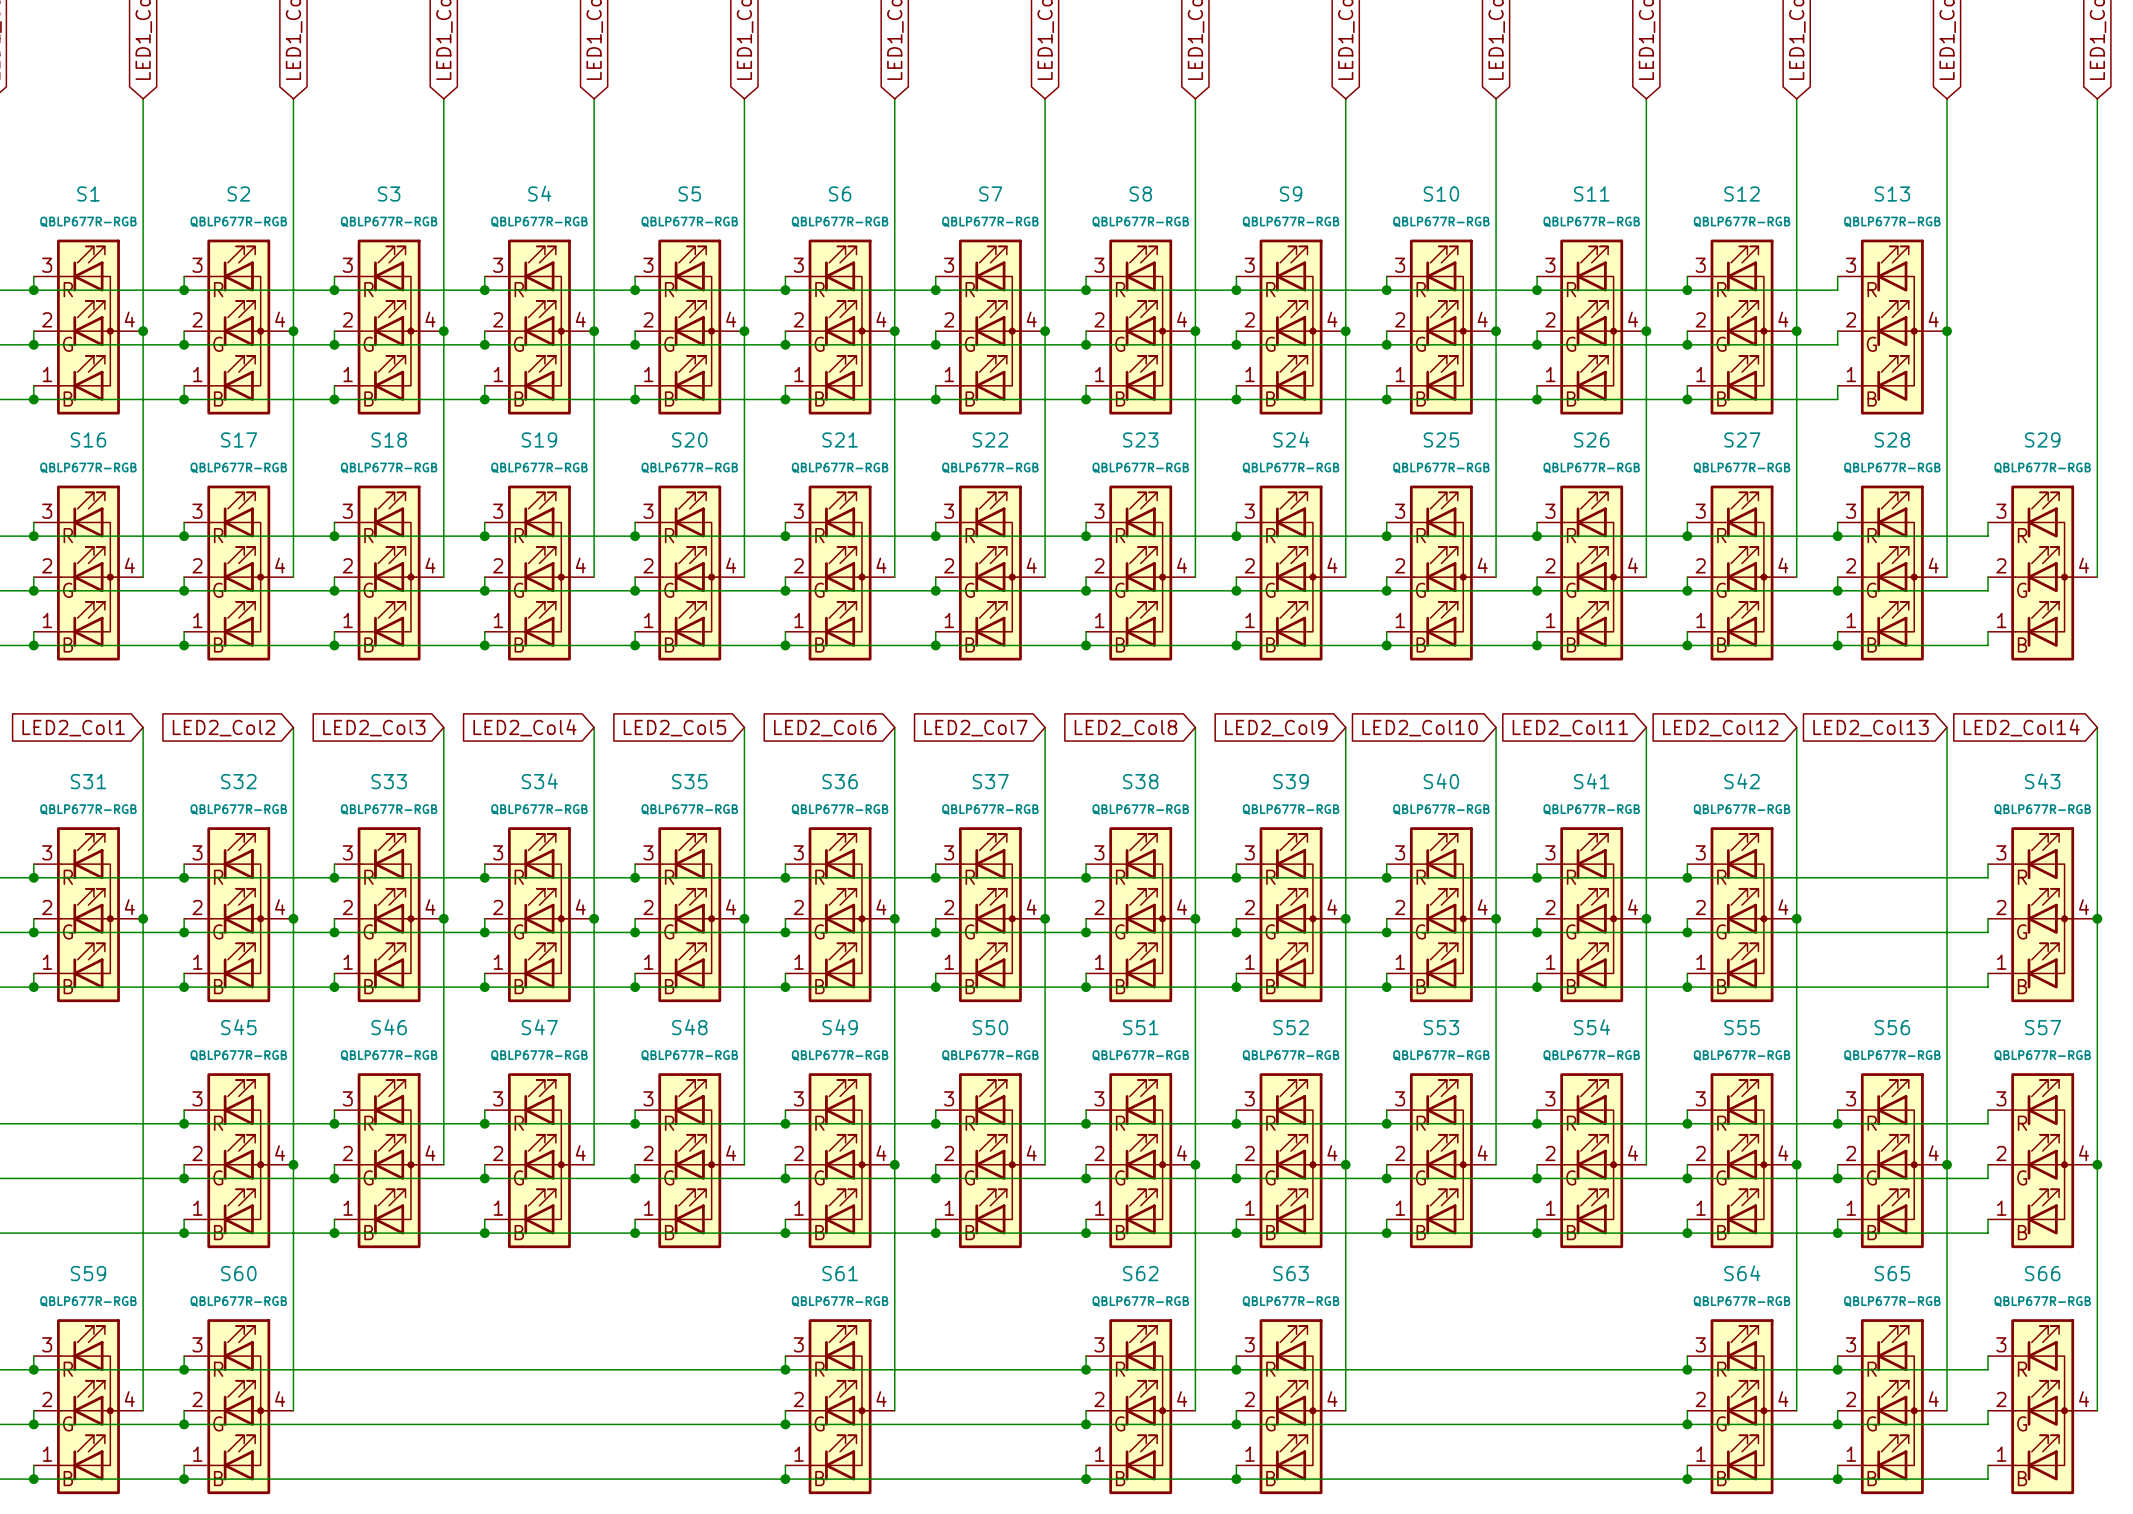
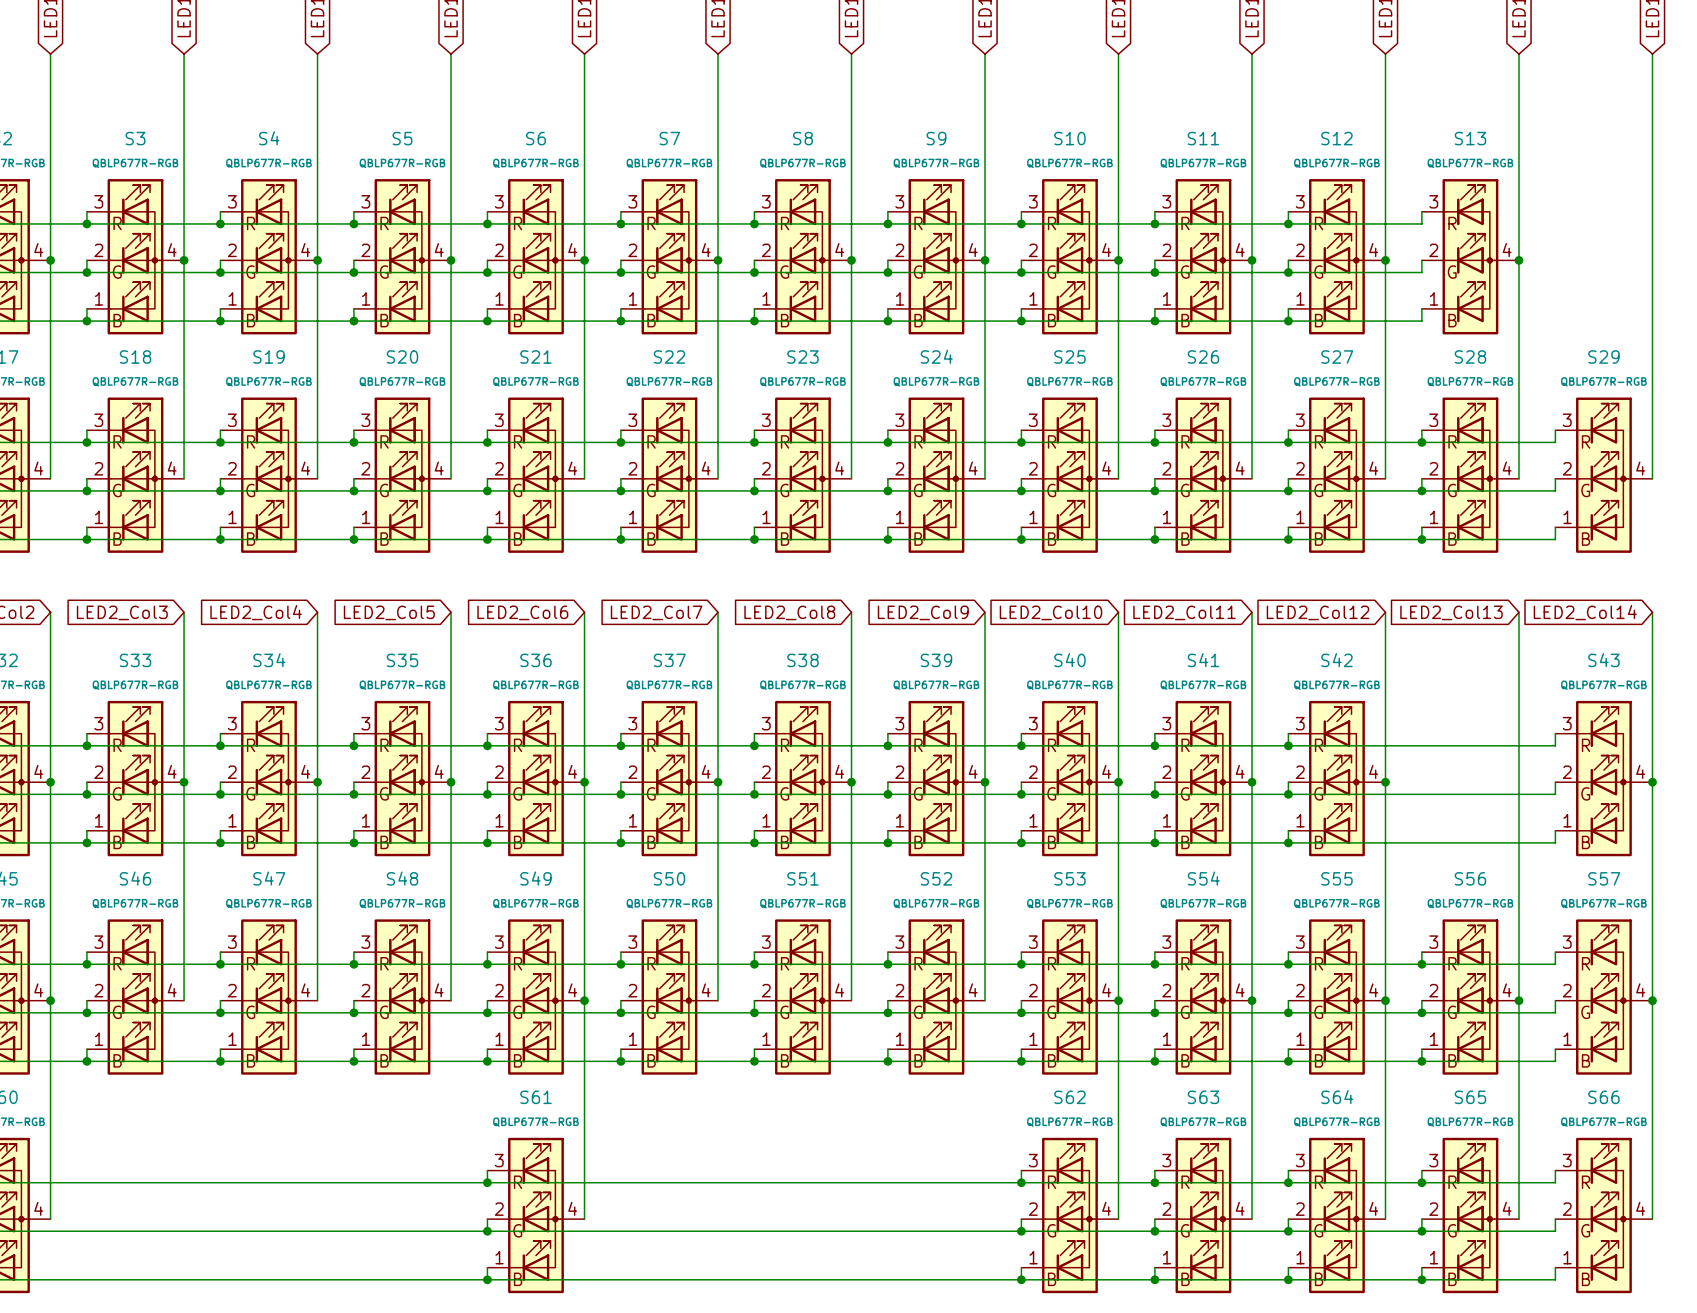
wire: (1195, 1164) (1195, 1410) -> none
junction: (1195, 1164) -> none
wire: (1345, 1164) (1345, 1410) -> (1118, 1000) (1118, 1219)
junction: (1345, 1164) -> none
junction: none -> (1118, 1000)
wire: none -> (1251, 1000) (1251, 1219)
junction: none -> (1251, 1000)
wire: (1086, 1356) (1086, 1369) -> none
wire: (1236, 1356) (1236, 1369) -> (1021, 1170) (1021, 1182)
wire: none -> (1154, 1170) (1154, 1182)
junction: (1086, 1369) -> none
junction: (1236, 1369) -> none
junction: none -> (1021, 1182)
junction: none -> (1154, 1182)
S62 position: (1140, 1406) -> (1069, 1215)
S63 position: (1291, 1406) -> (1203, 1215)
wire: (1086, 1410) (1086, 1424) -> none
wire: (1236, 1410) (1236, 1424) -> (1021, 1219) (1021, 1231)
wire: none -> (1154, 1219) (1154, 1231)
junction: (1086, 1424) -> none
junction: (1236, 1424) -> none
junction: none -> (1021, 1231)
junction: none -> (1154, 1231)
wire: (1086, 1465) (1086, 1479) -> none
wire: (1236, 1465) (1236, 1479) -> (1021, 1267) (1021, 1279)
wire: none -> (1154, 1267) (1154, 1279)
junction: (1086, 1479) -> none
junction: (1236, 1479) -> none
junction: none -> (1021, 1279)
junction: none -> (1154, 1279)

